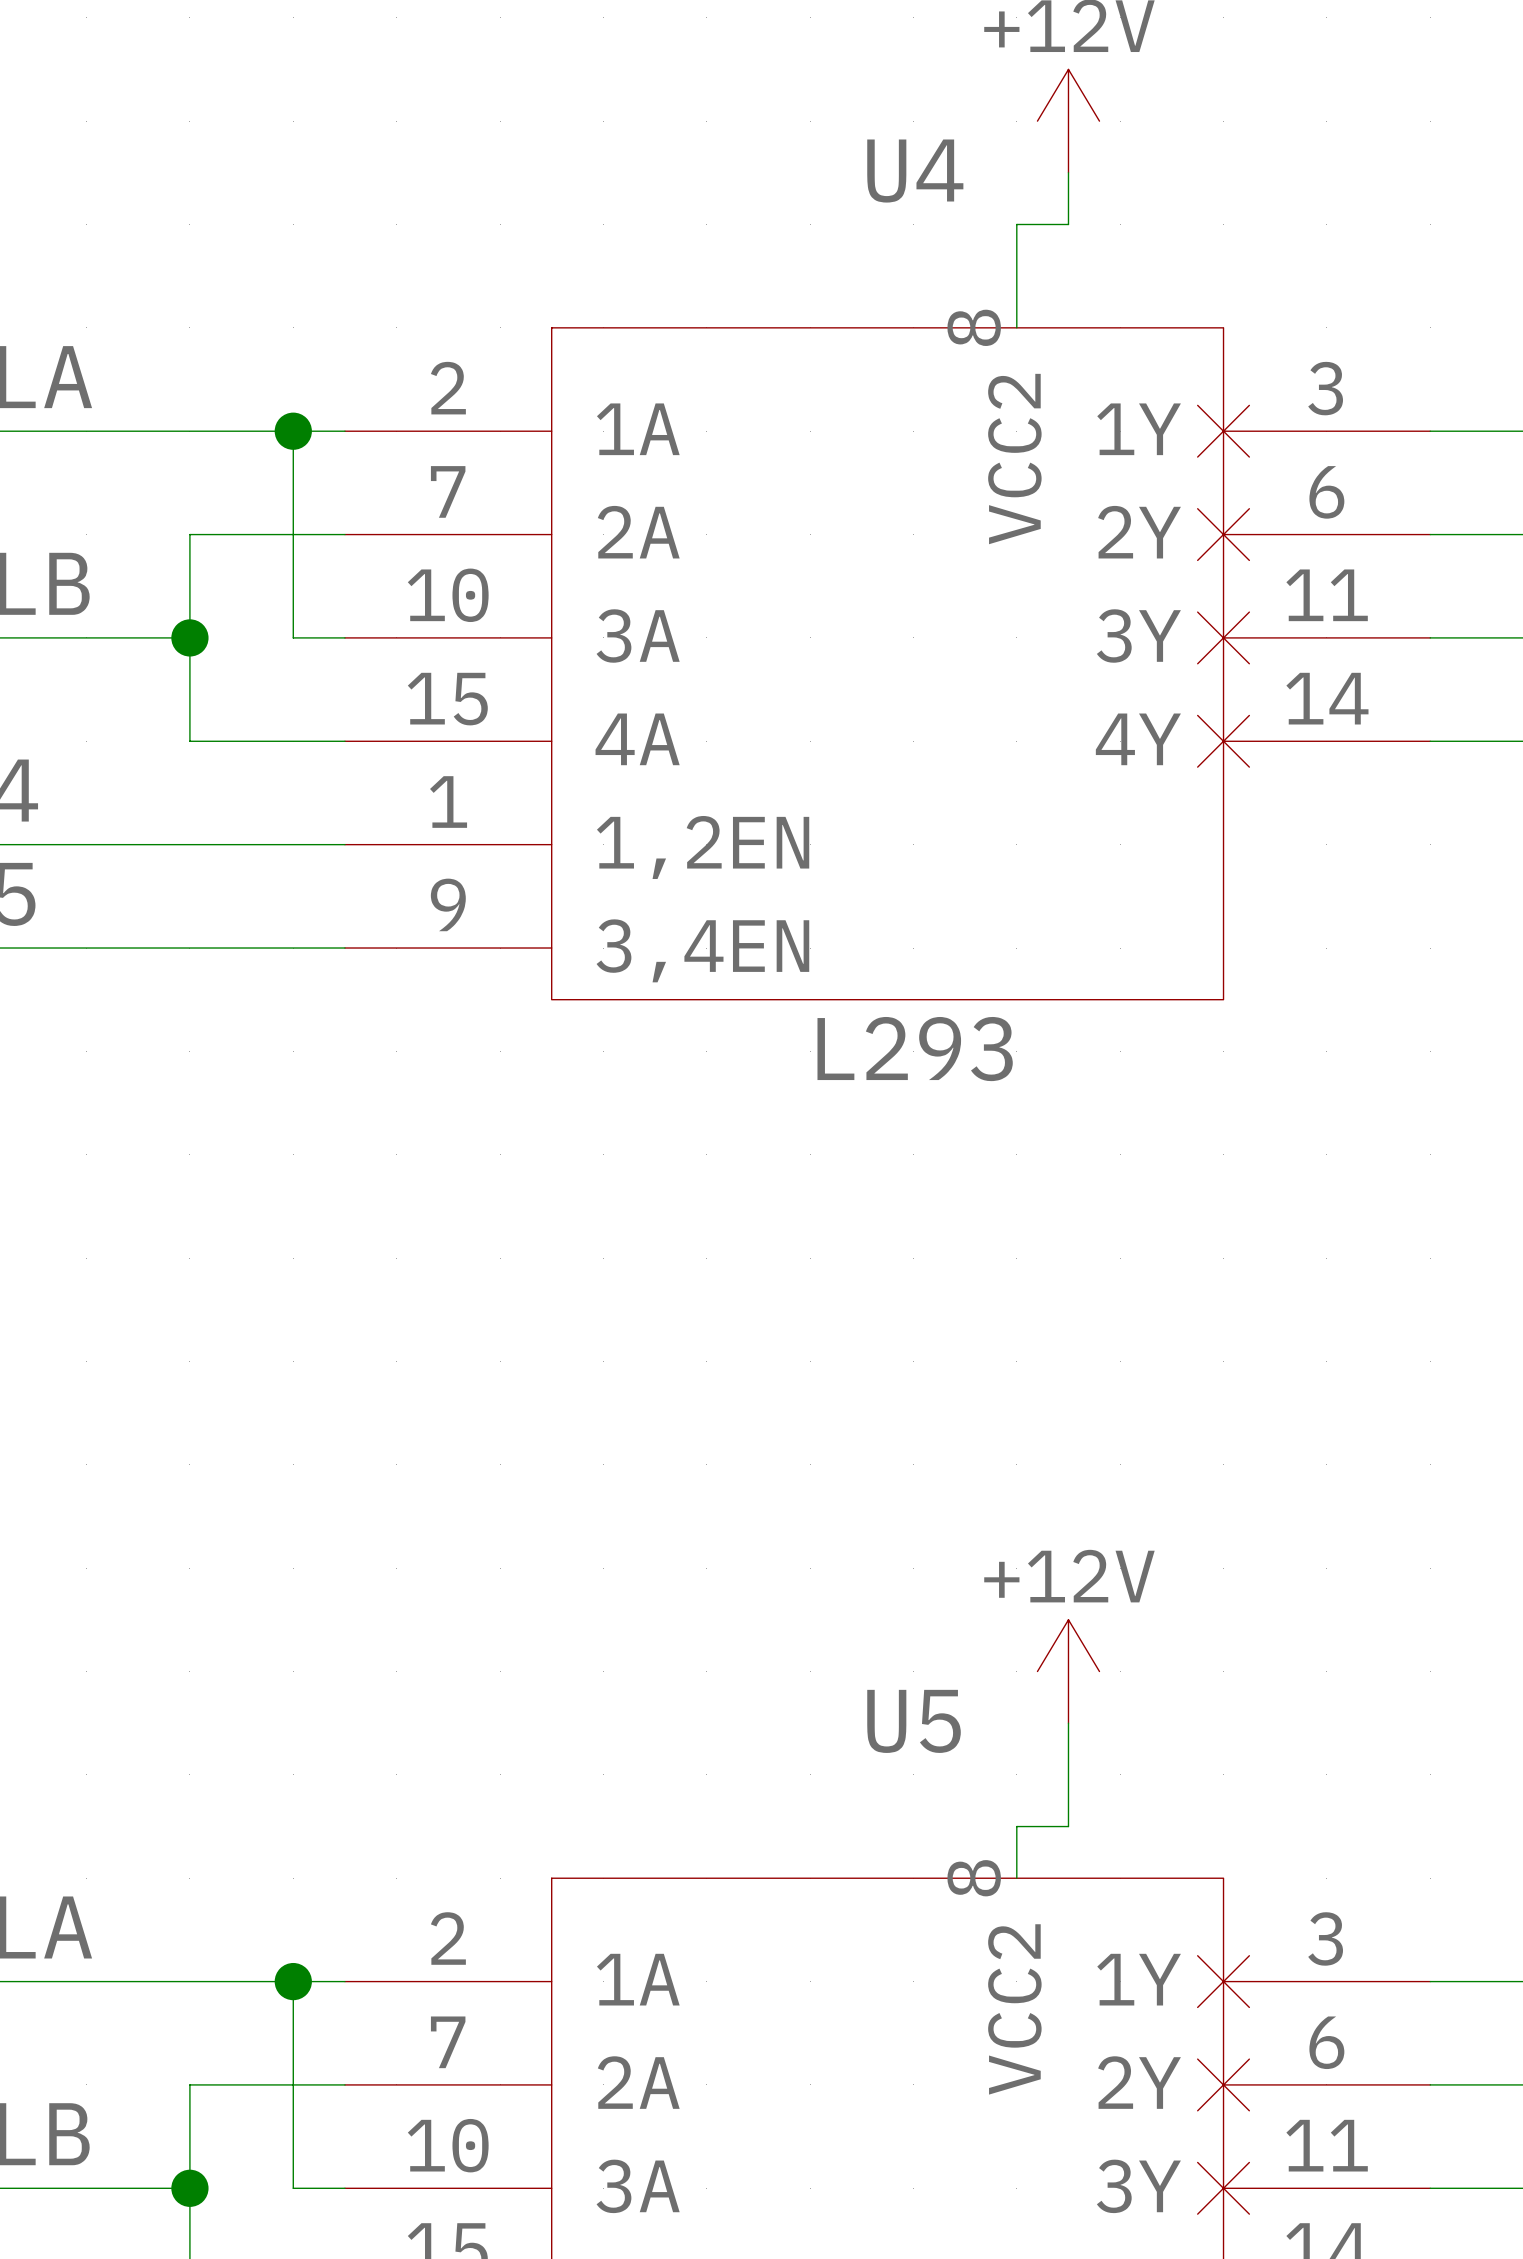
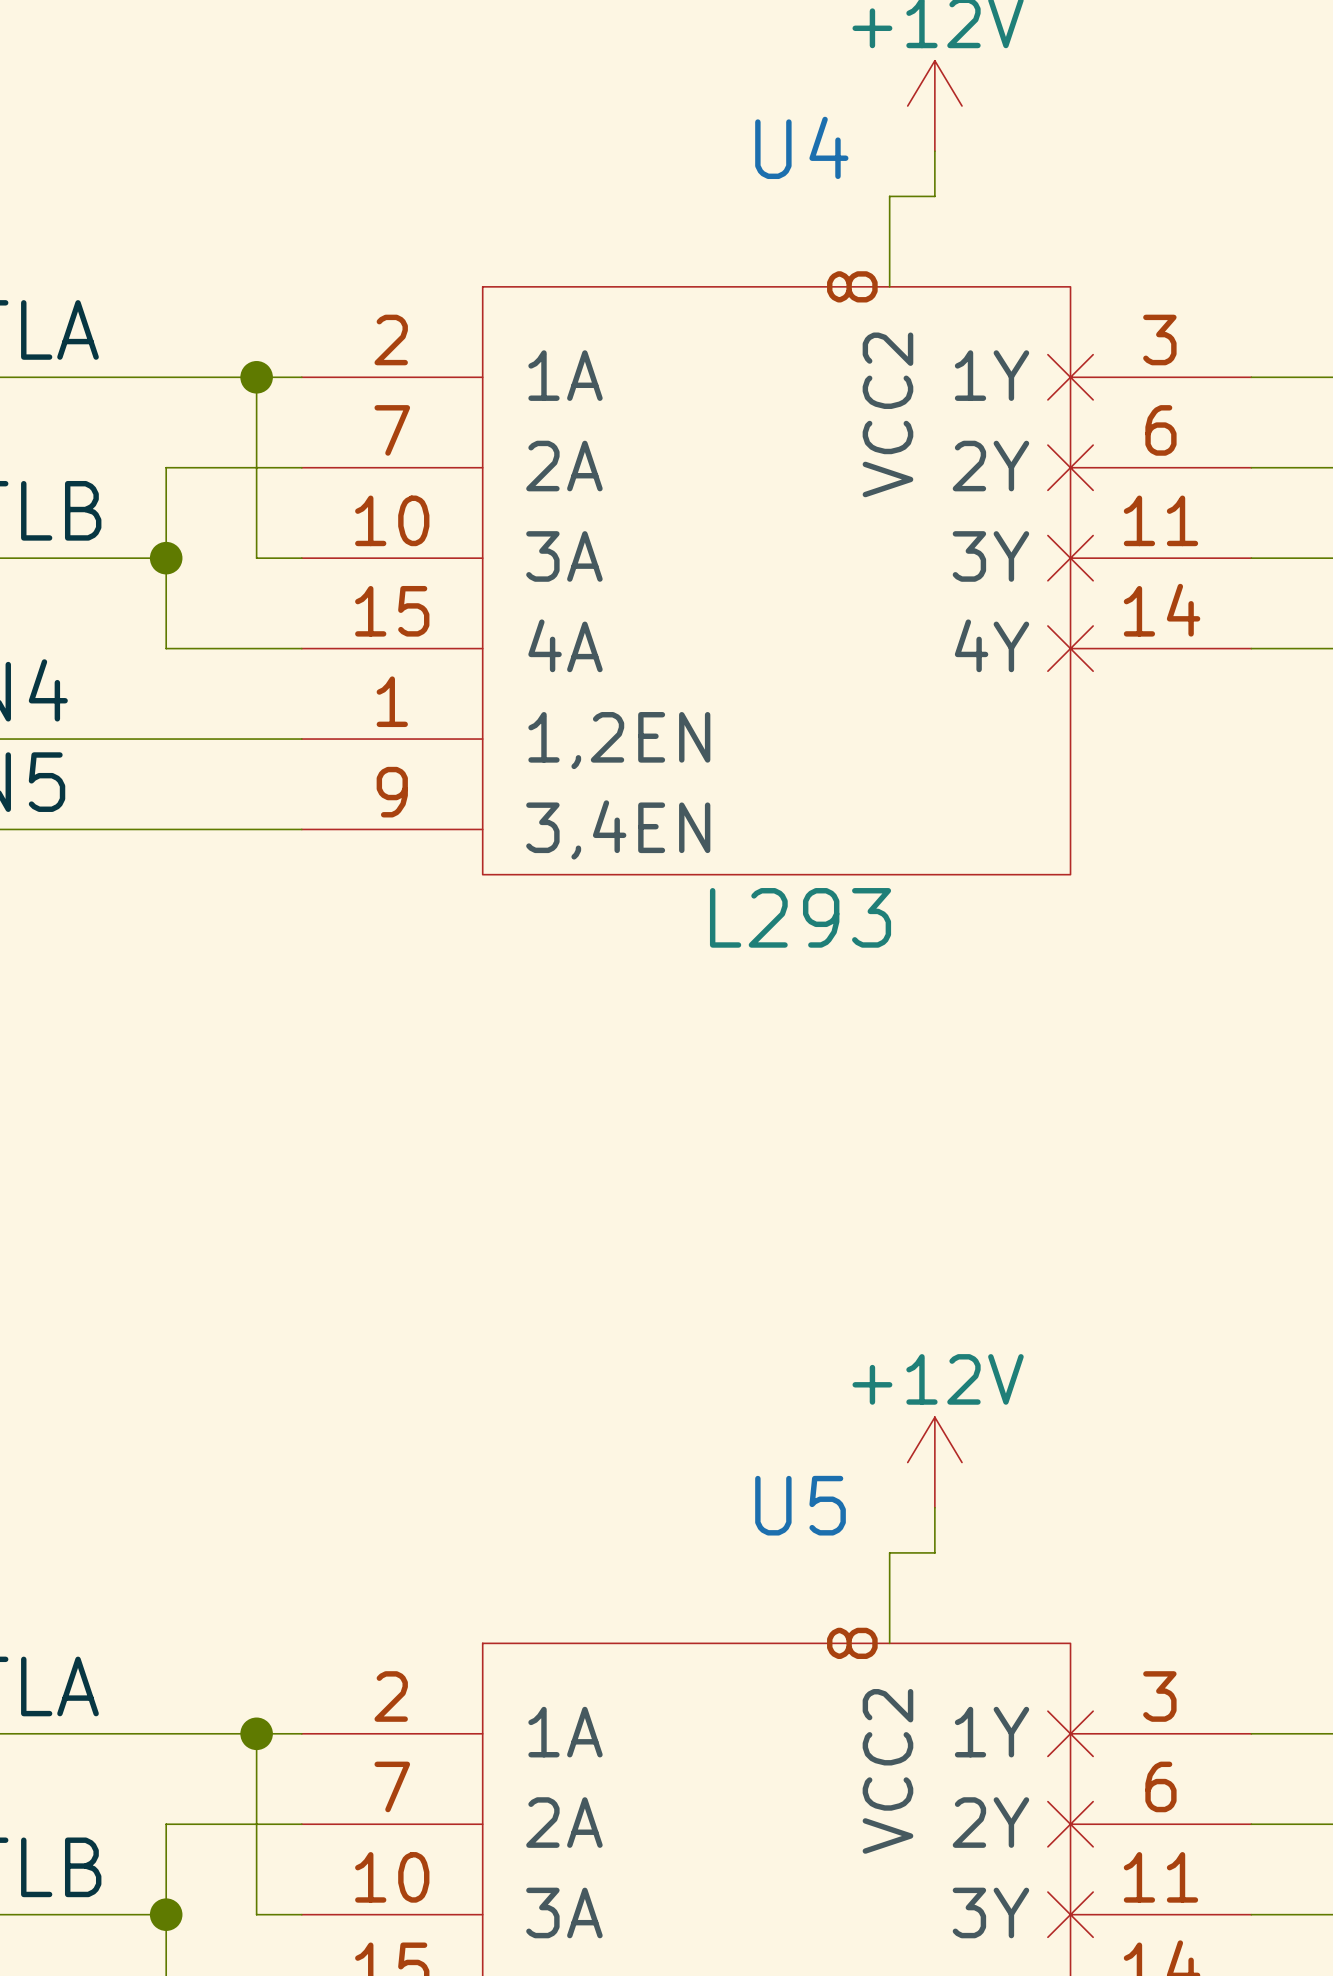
wire: (1068, 1774) (1068, 1826) (1016, 1826) -> (934, 1552) (889, 1552) (889, 1598)

